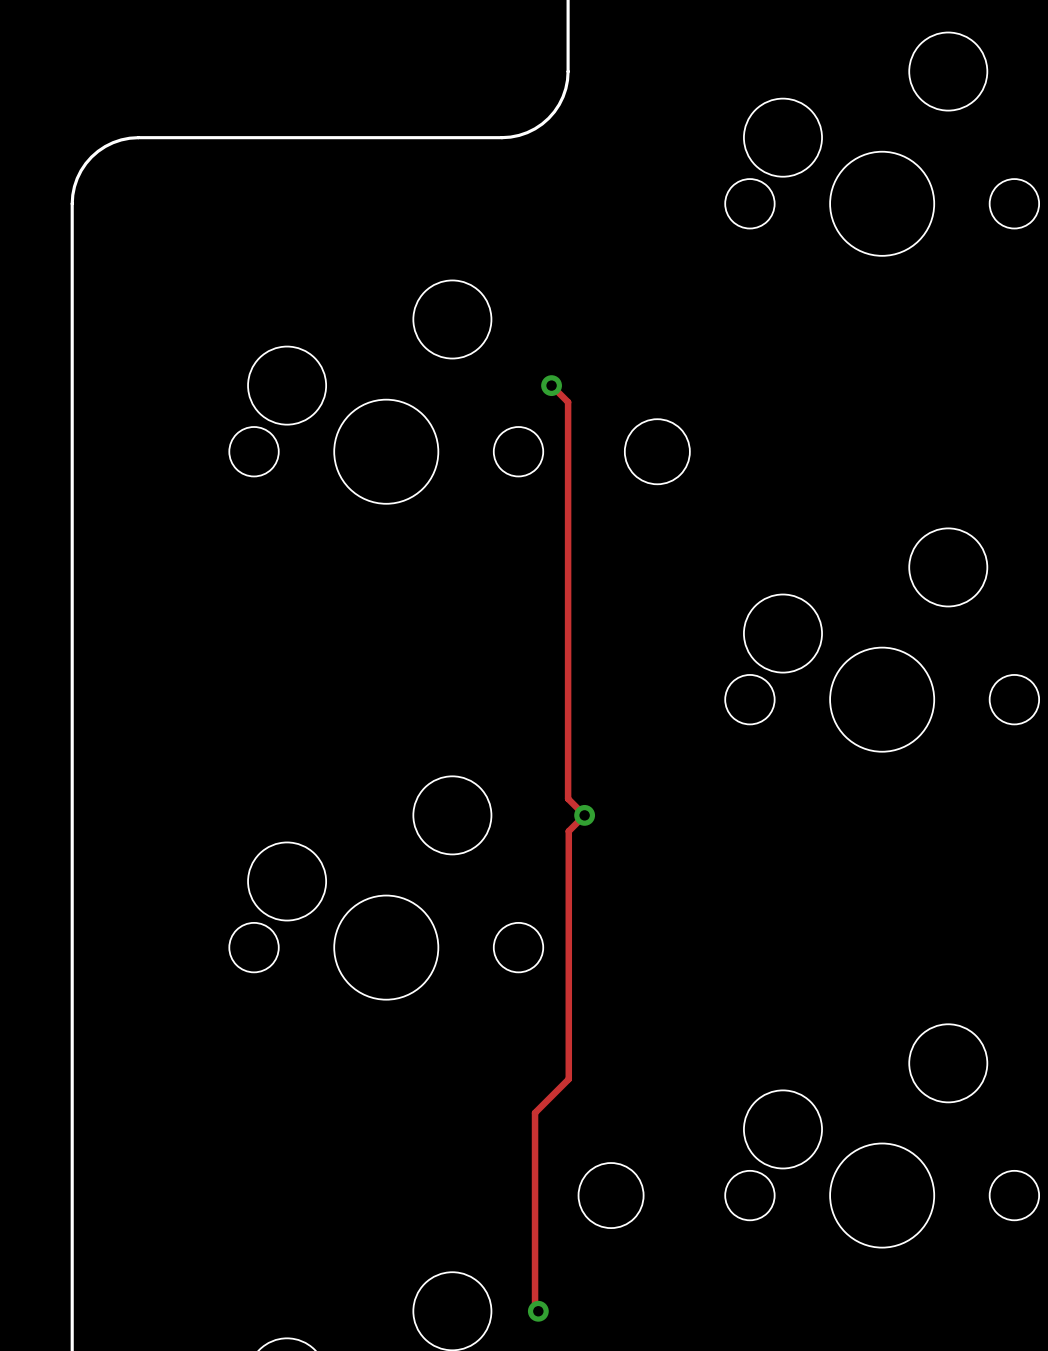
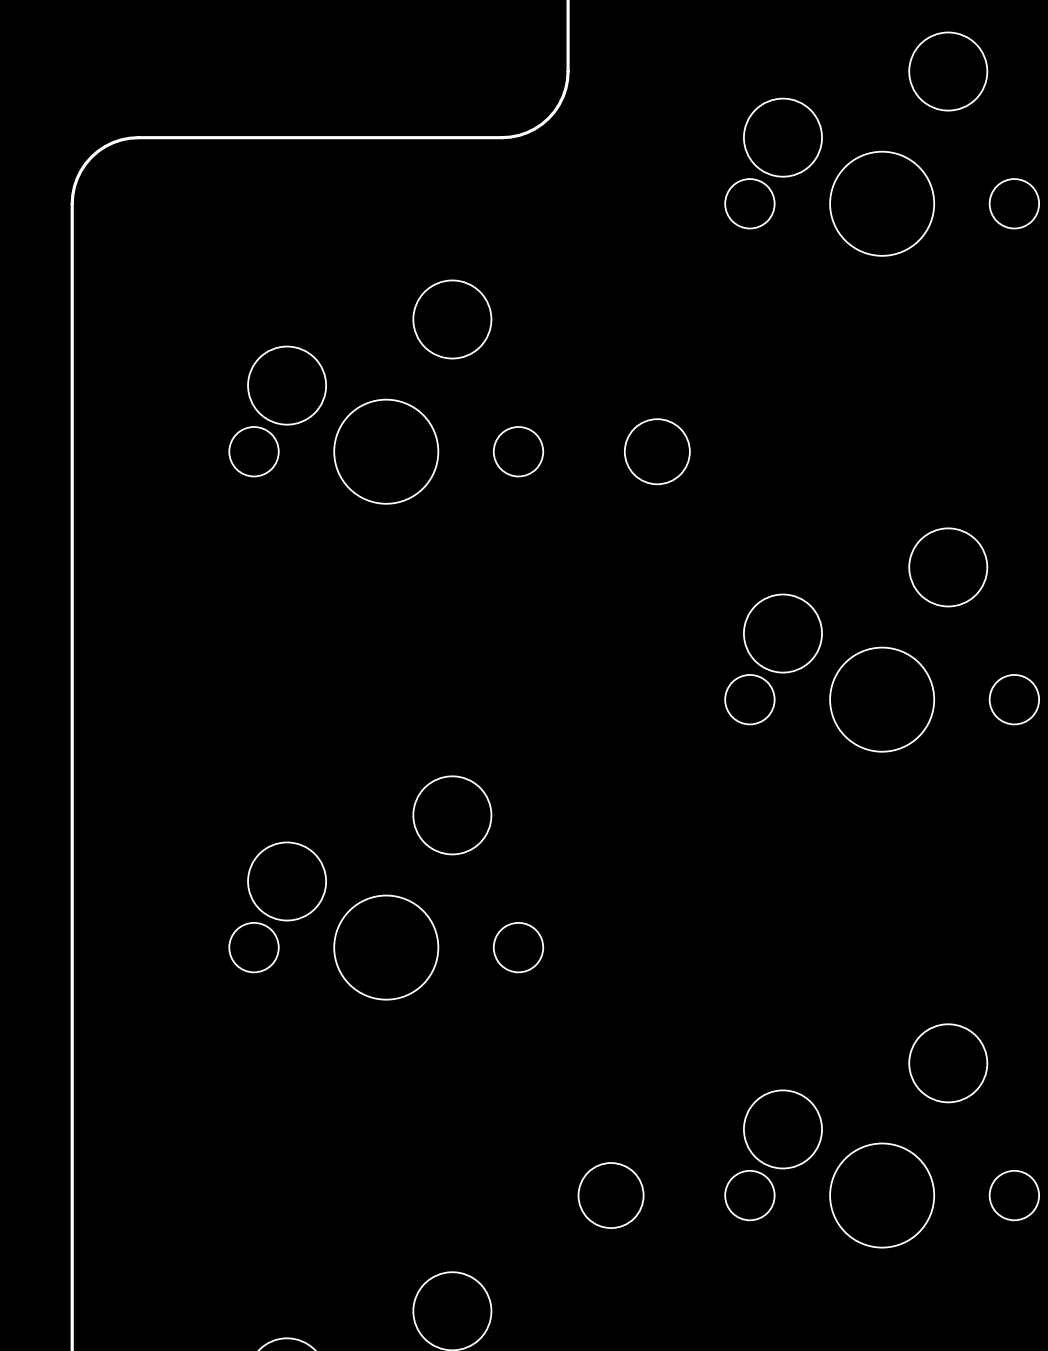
track: (551, 385) (568, 402) (568, 798) (584, 815) (568, 831) (568, 1079) (535, 1112) (535, 1307) (538, 1311) -> none
via: (551, 385) -> none
via: (584, 815) -> none
via: (538, 1311) -> none

